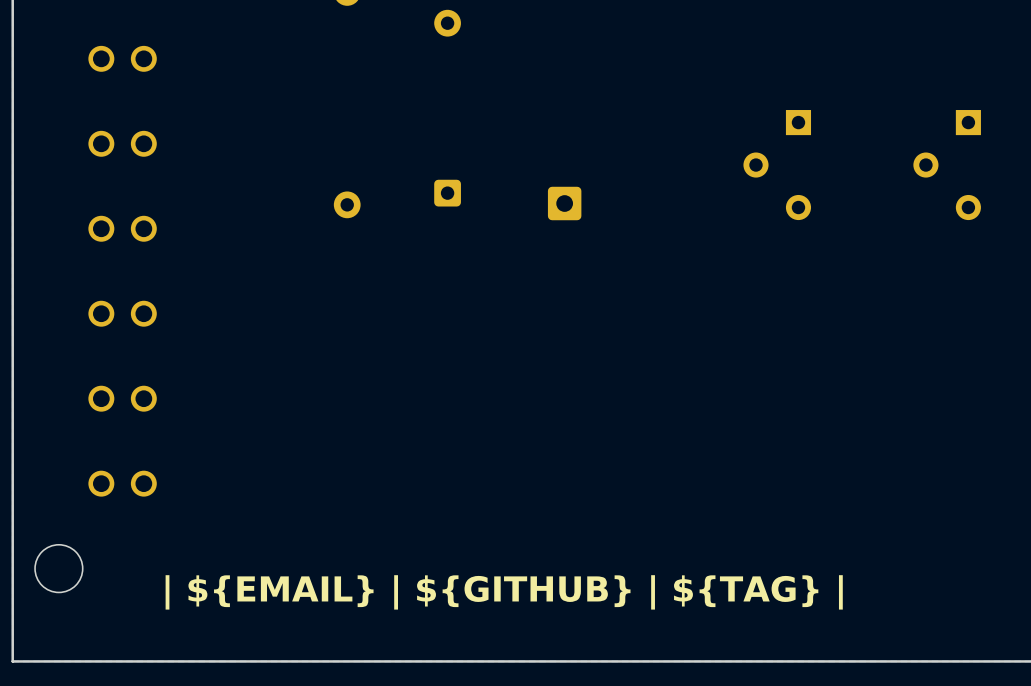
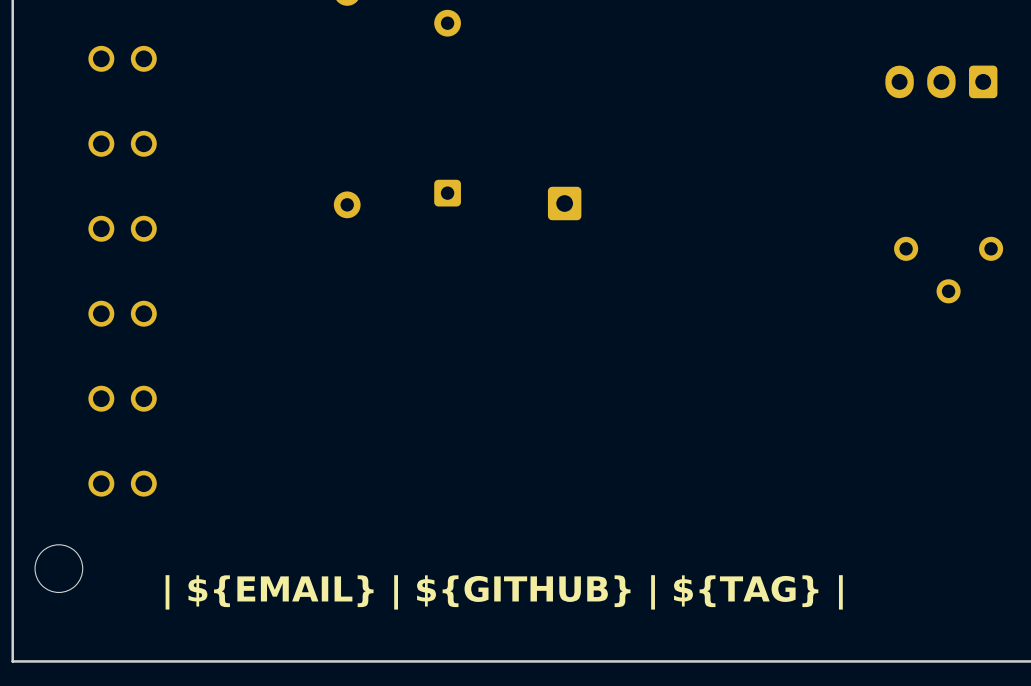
part: none -> (941, 81)
part: (777, 165) -> none
part: (947, 165) -> none
part: none -> (948, 270)

